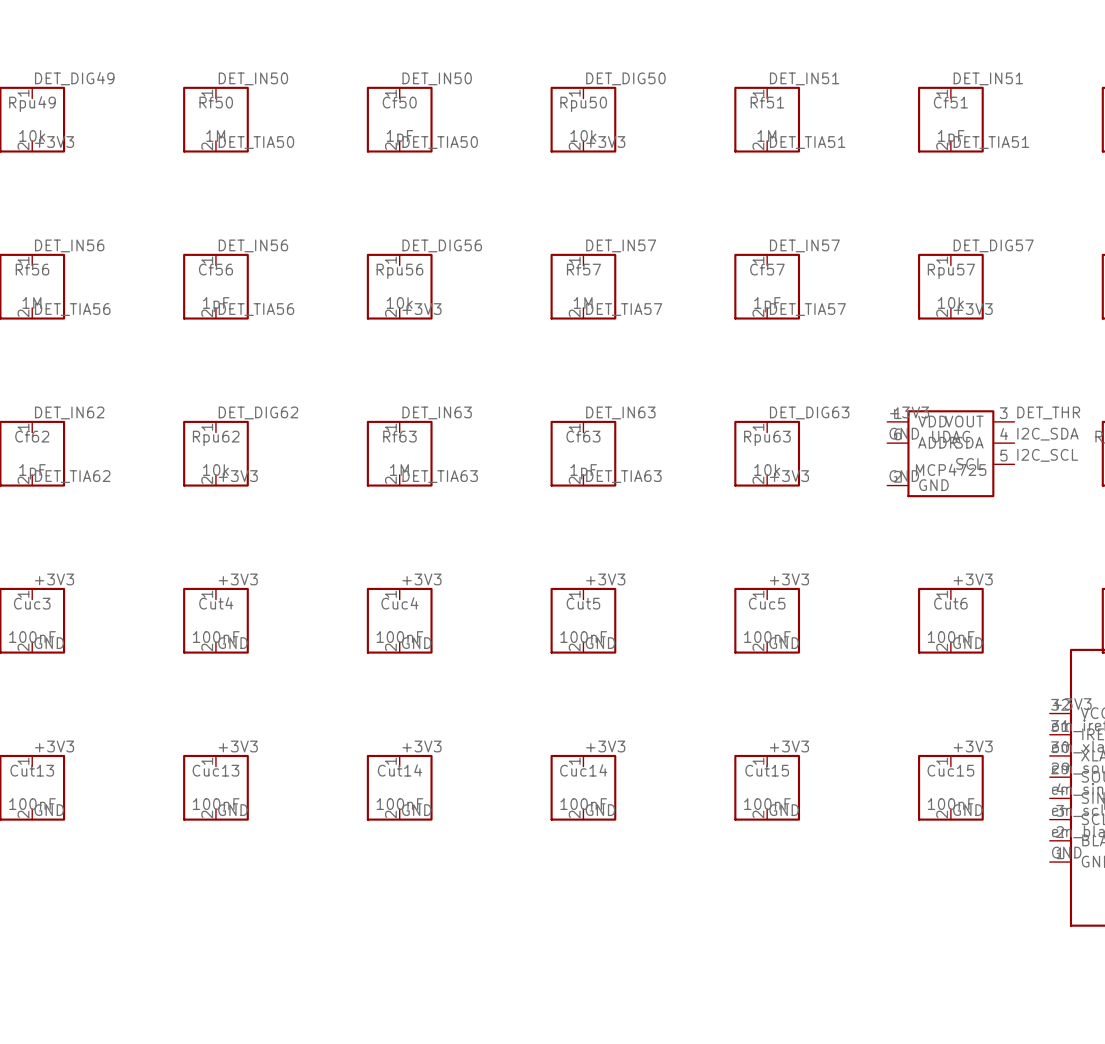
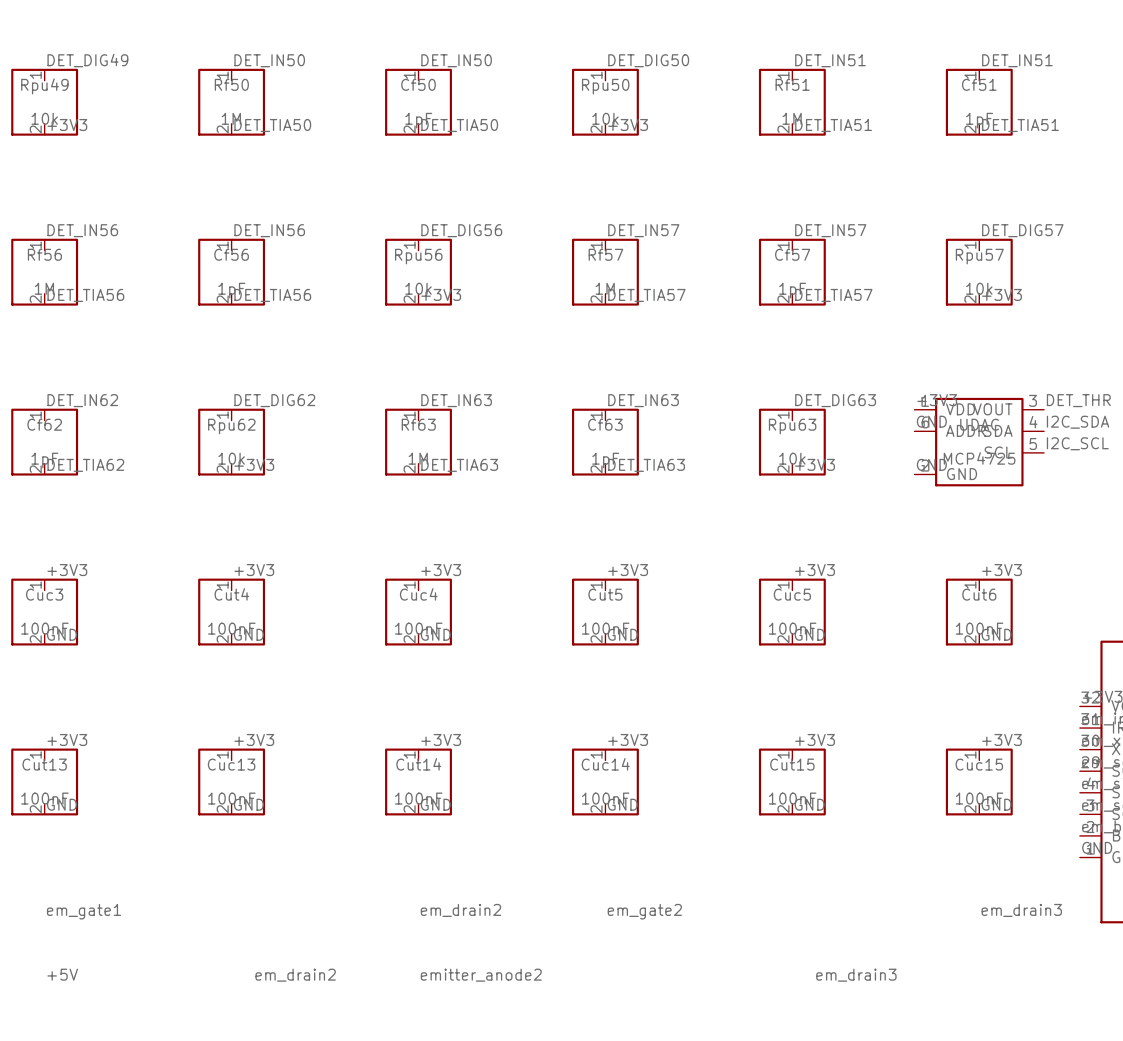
label: none -> em_drain2 (460, 910)
label: none -> em_drain3 (1021, 910)
label: none -> em_gate1 (84, 911)
label: none -> em_gate2 (644, 911)
label: none -> +5V (62, 974)
label: none -> em_drain2 (295, 975)
label: none -> emitter_anode2 (481, 975)
label: none -> em_drain3 (856, 975)

